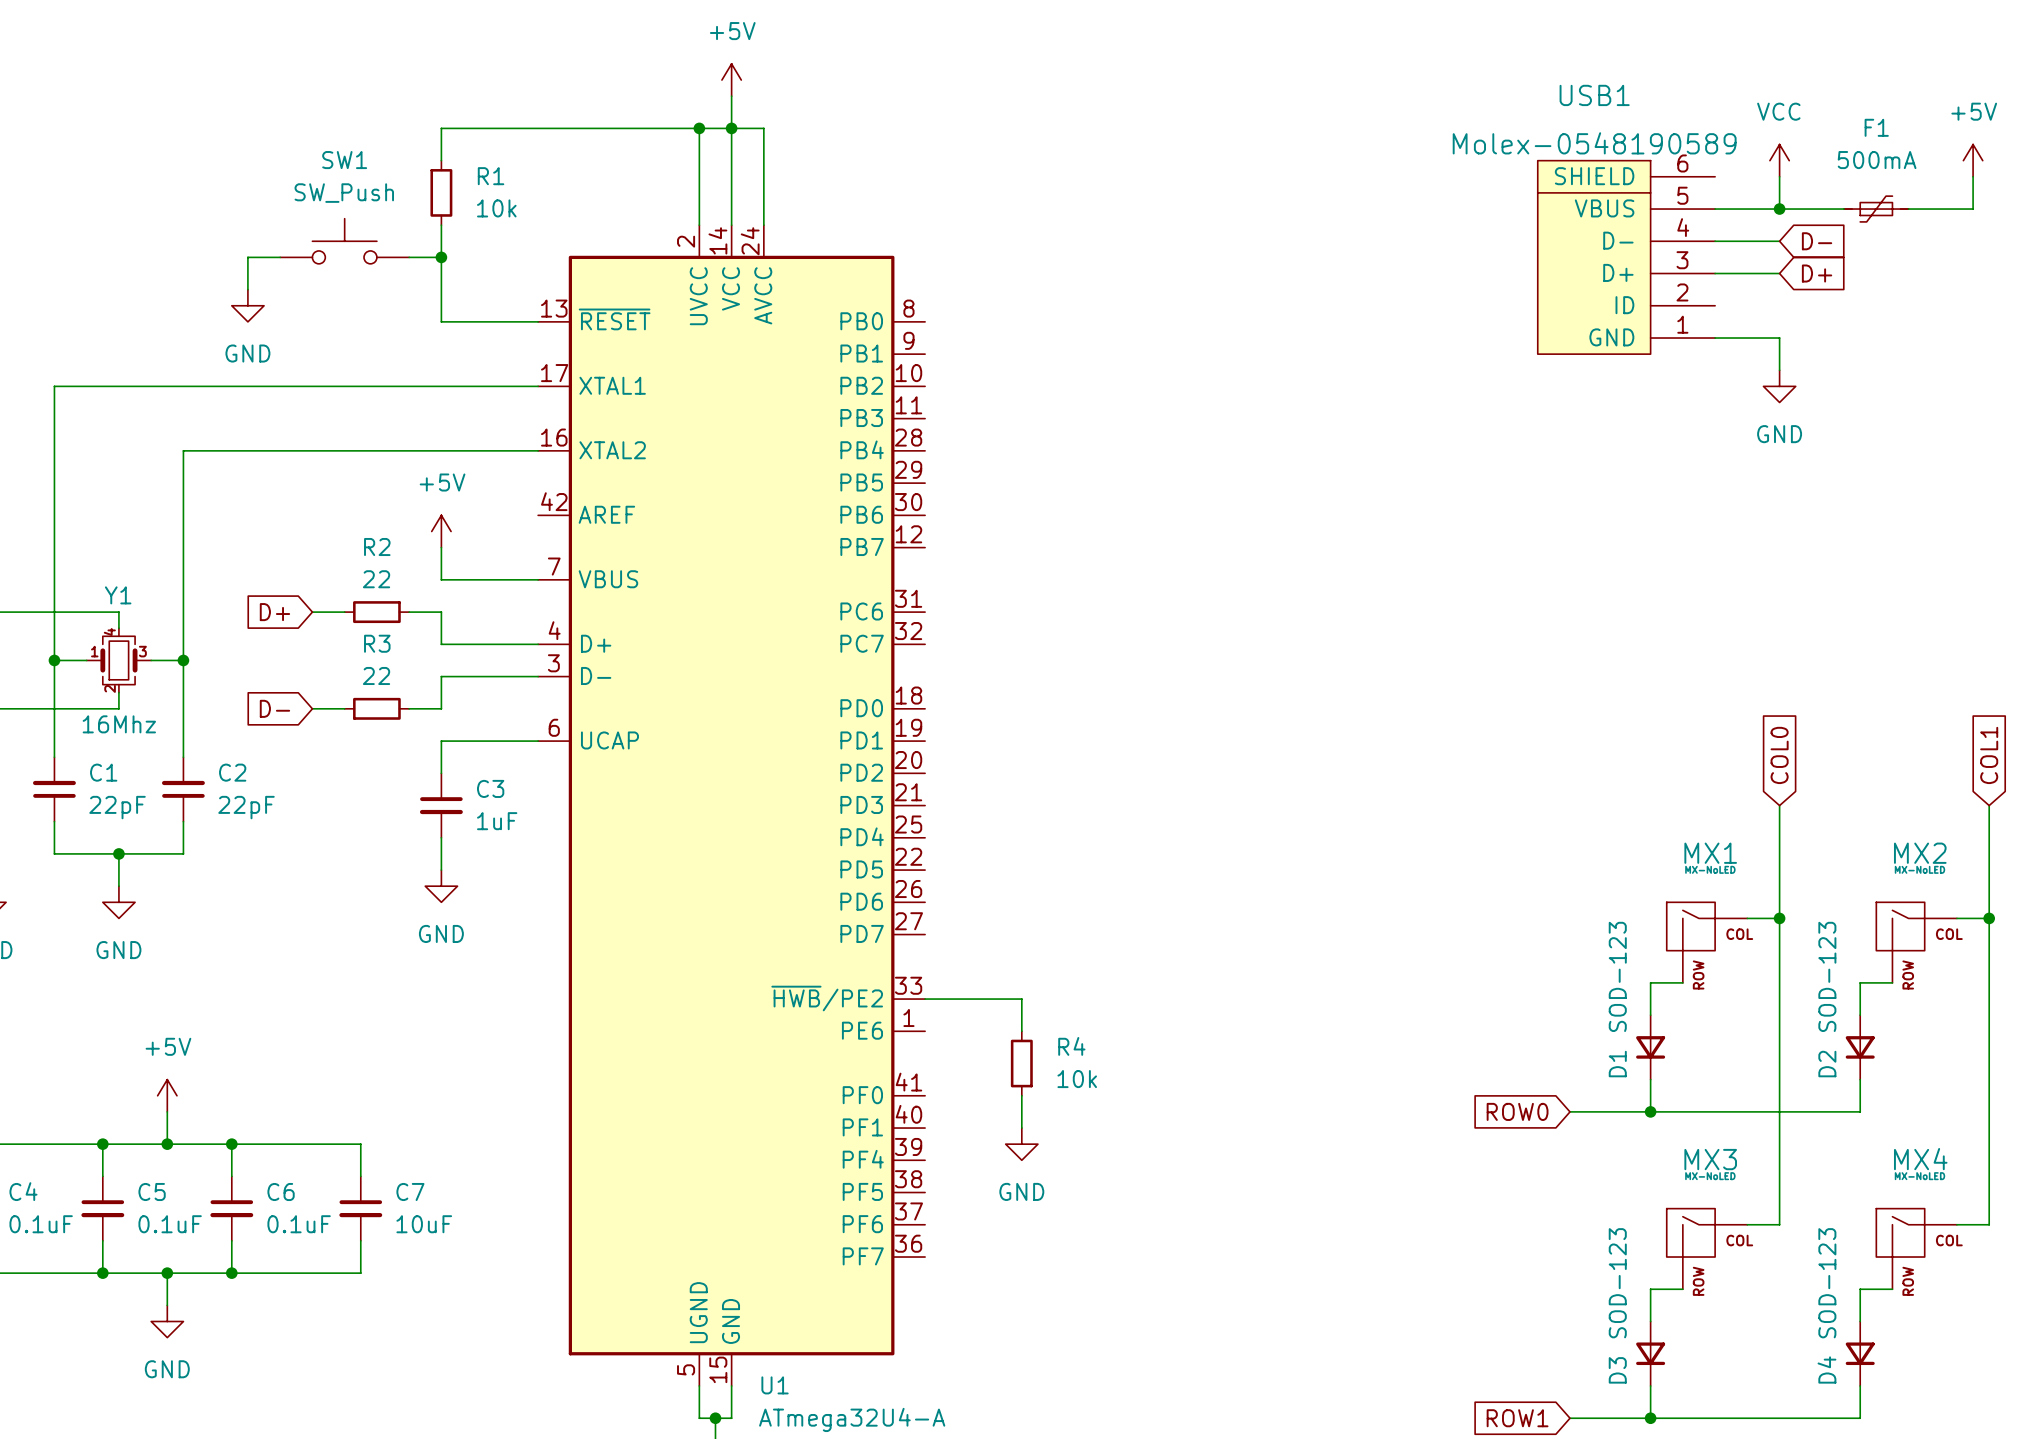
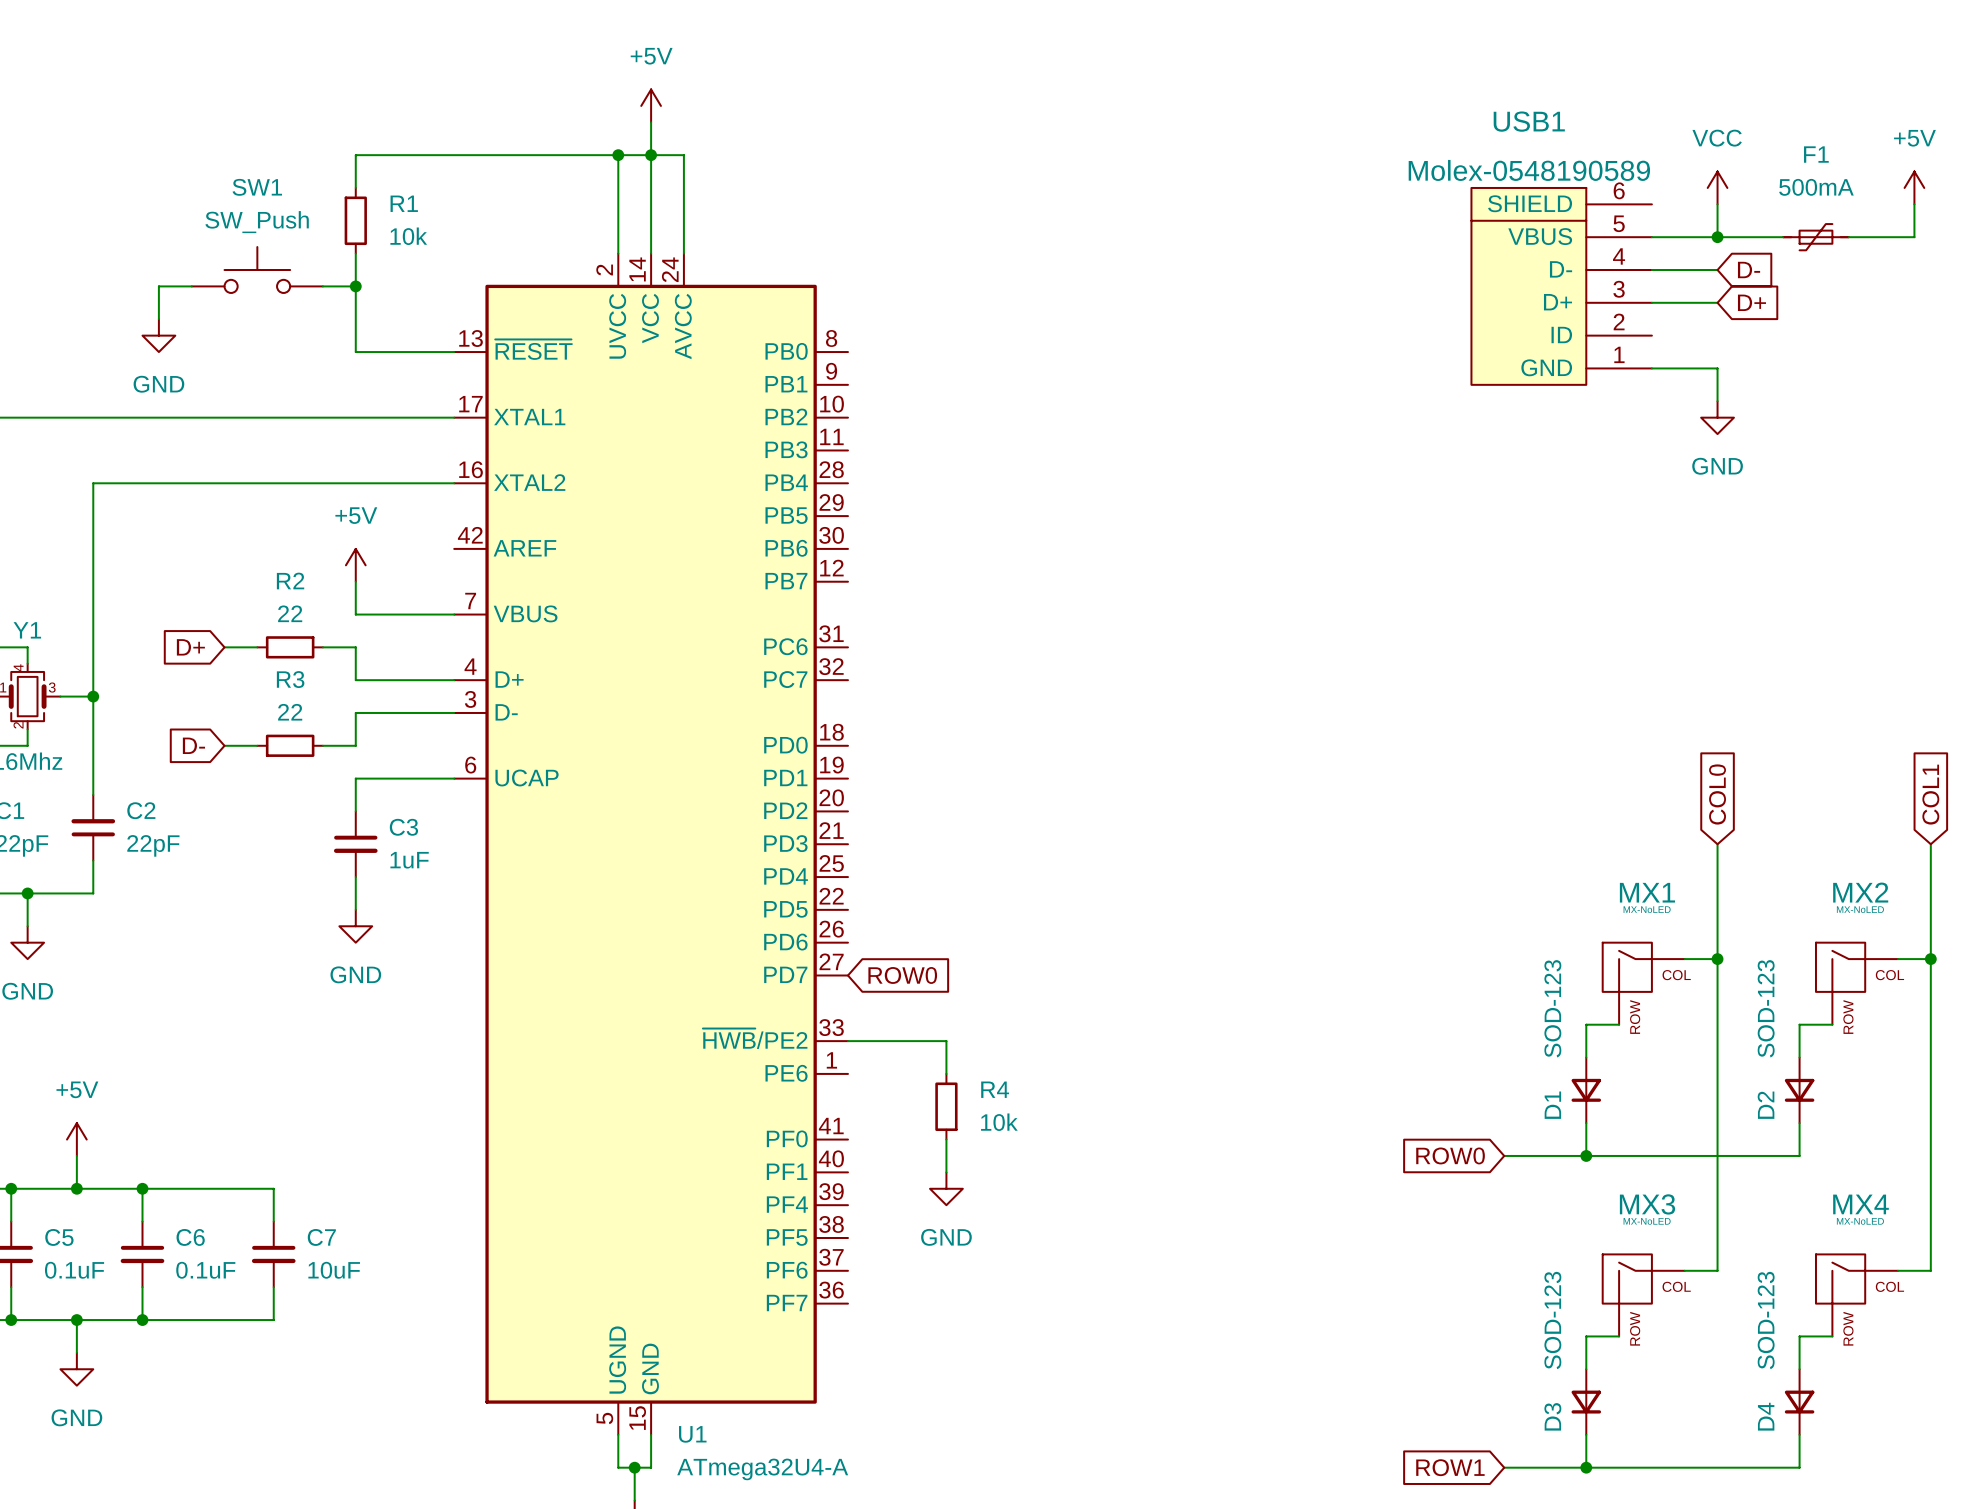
global label: none -> ROW0 (902, 975)

